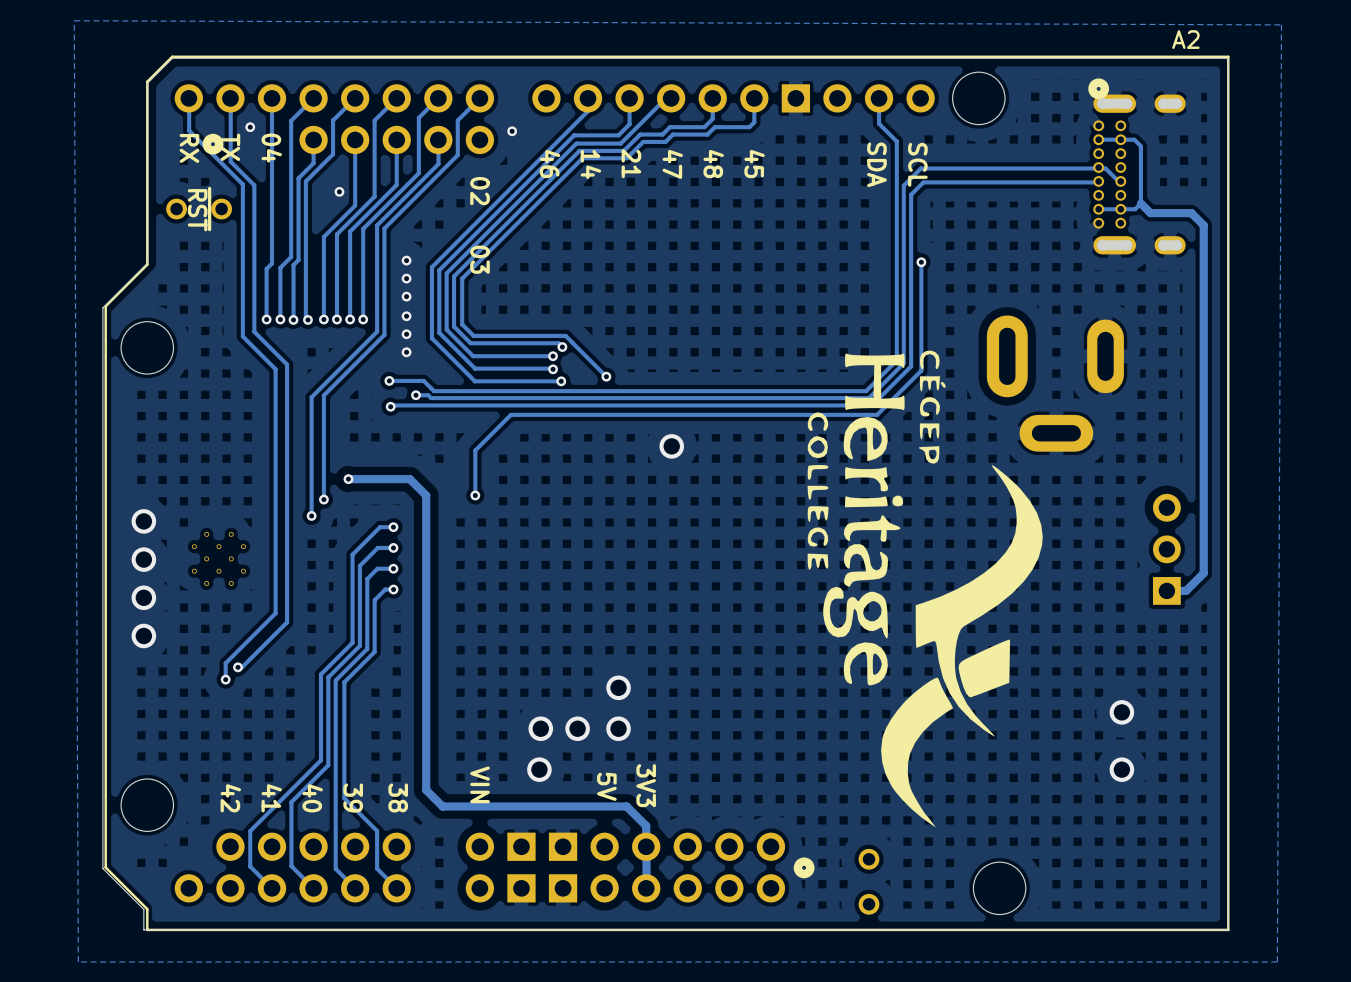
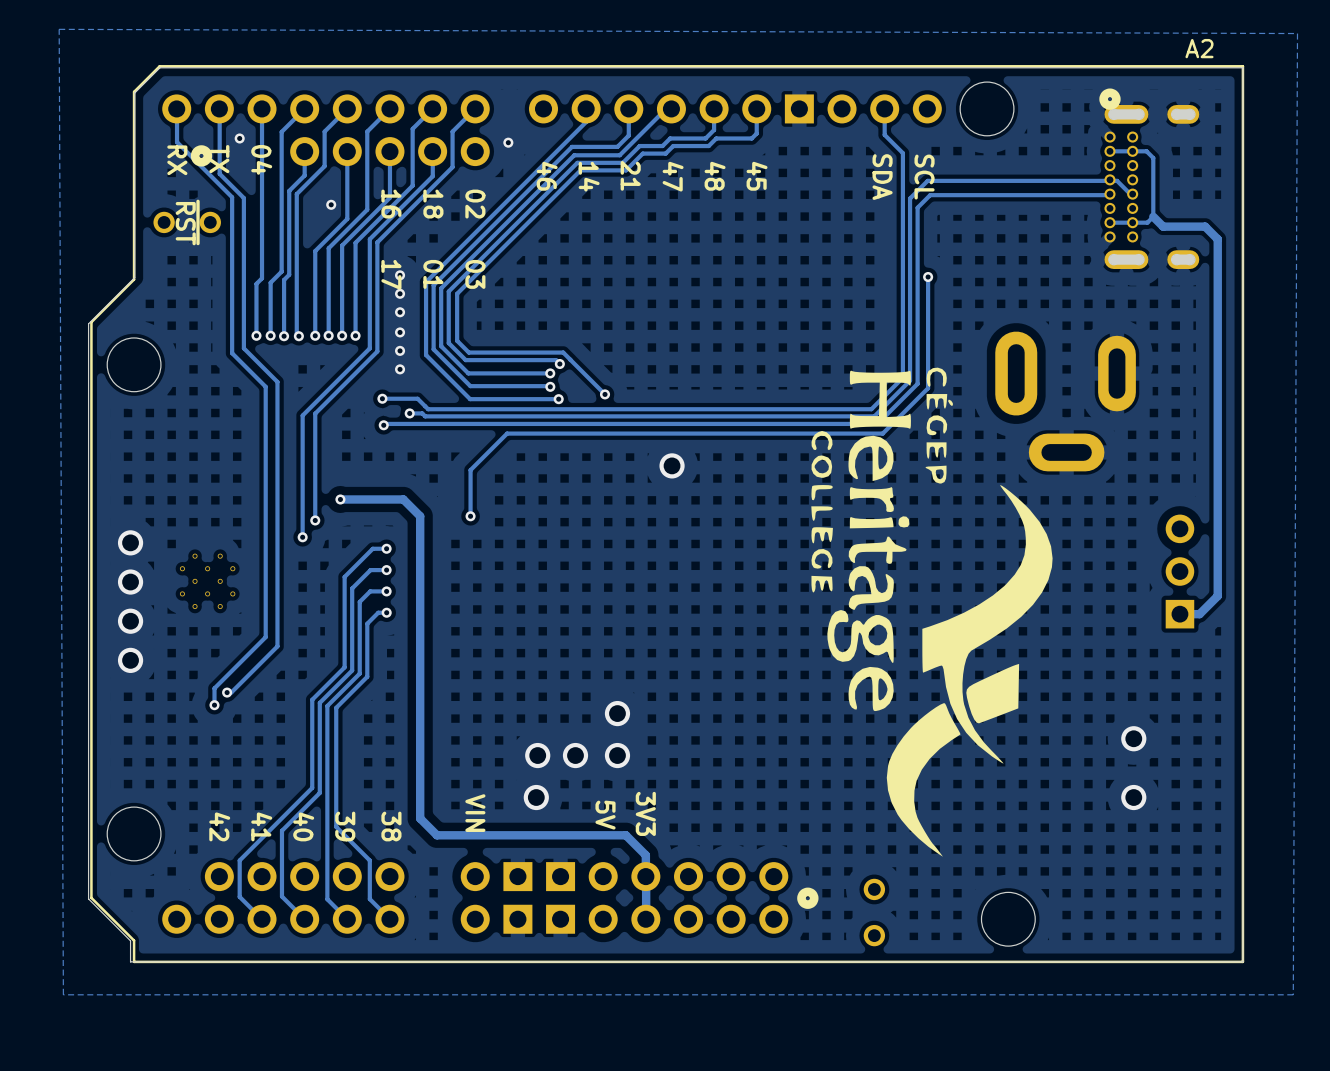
text: none -> 16 17 (391, 239)
text: none -> 18 01 (433, 239)

